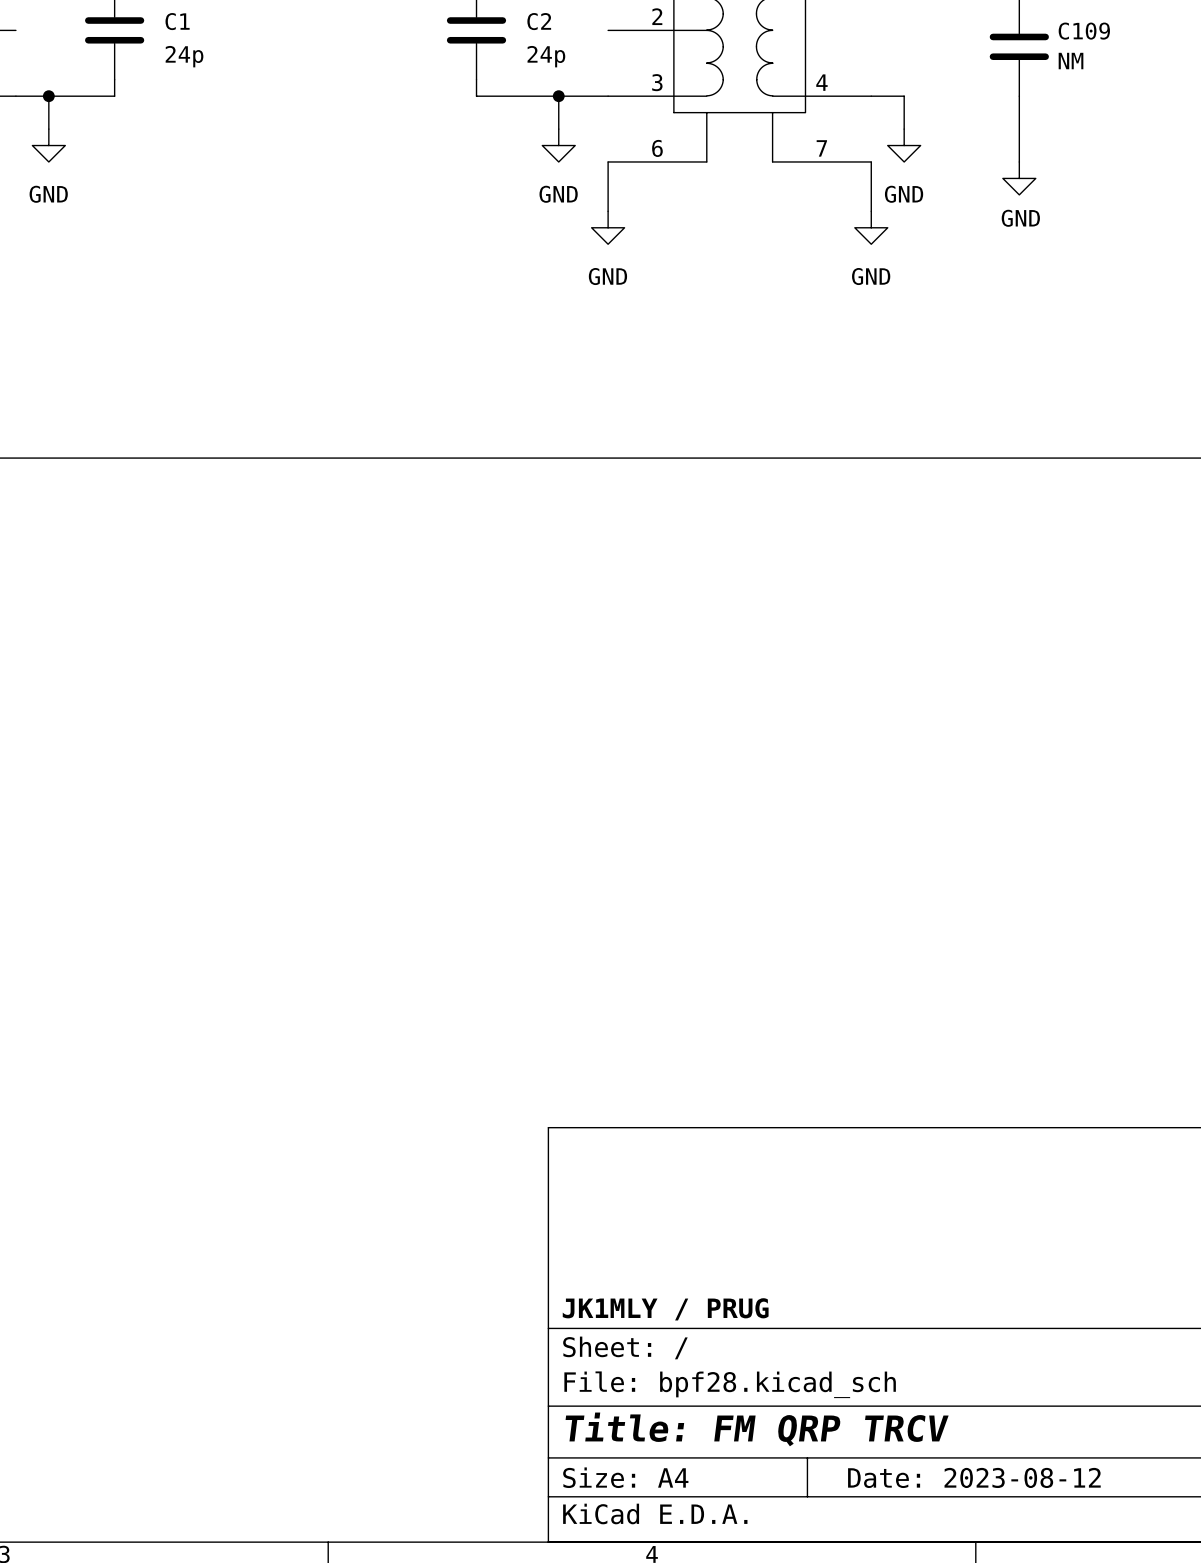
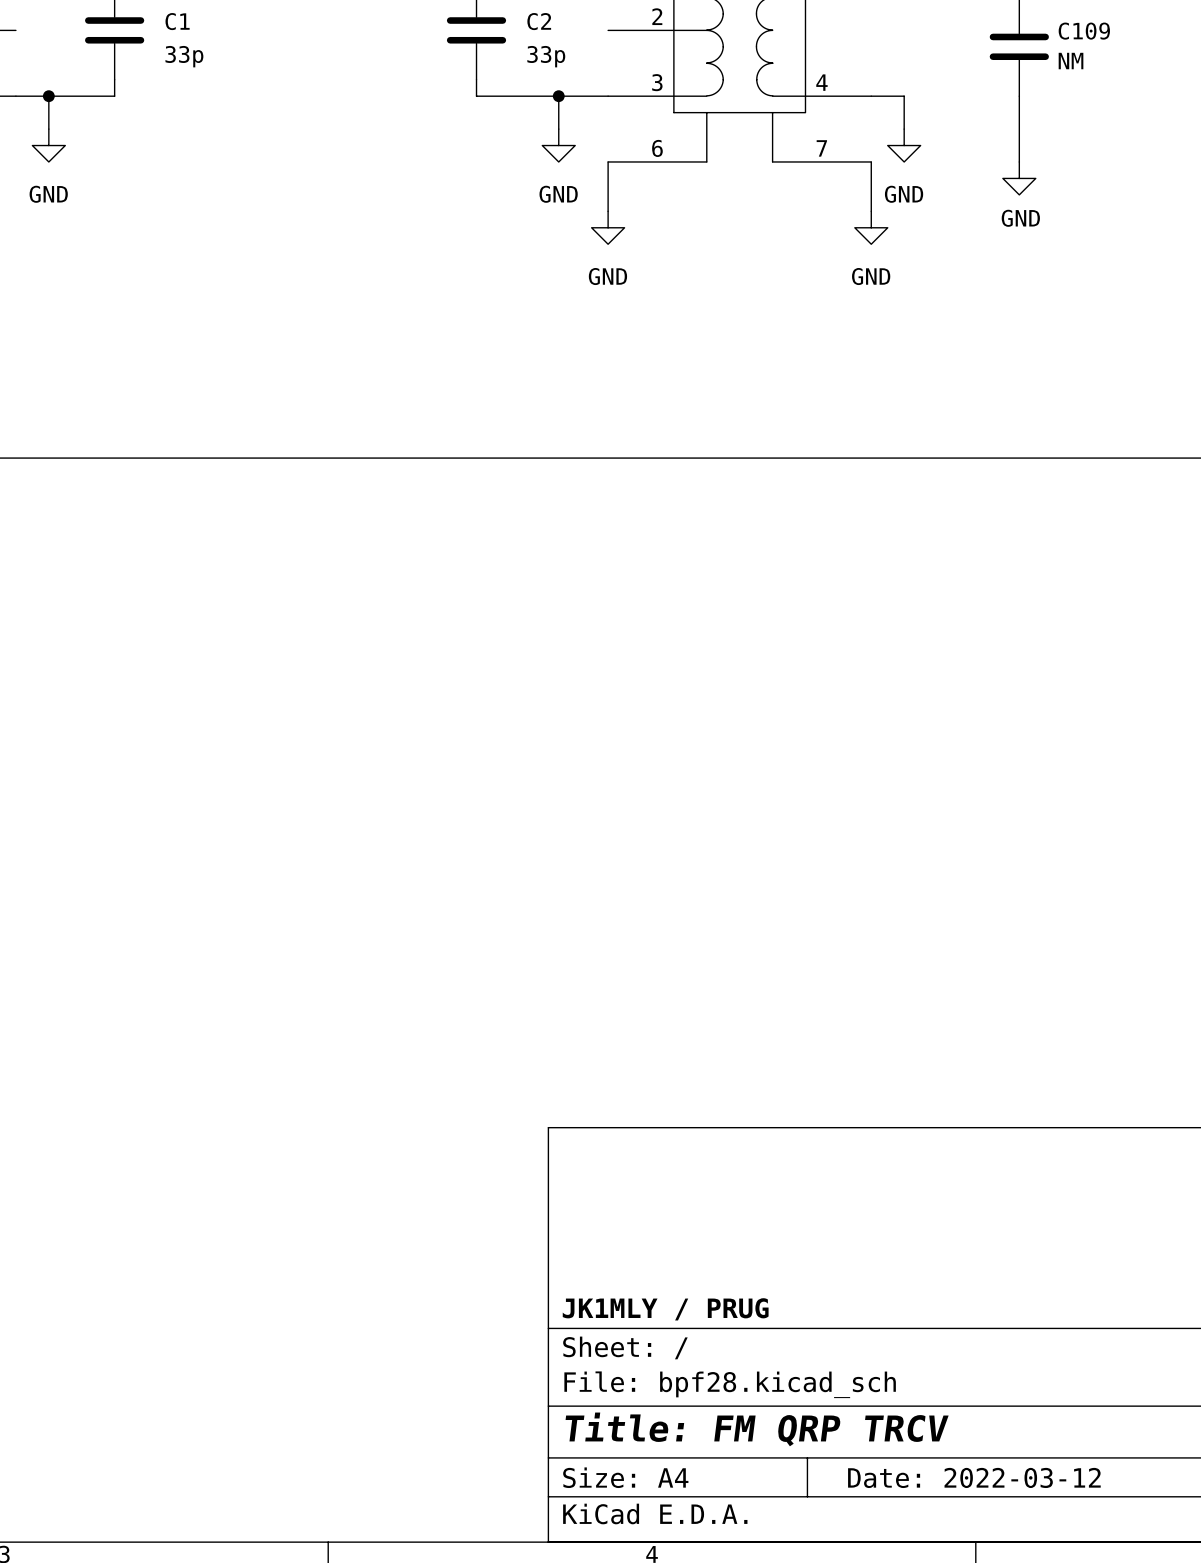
C1 value: 24p (184, 56) -> 33p (184, 56)
C2 value: 24p (546, 56) -> 33p (546, 56)
title block: Date: 2023-08-12 (974, 1477) -> Date: 2022-03-12 (974, 1477)

